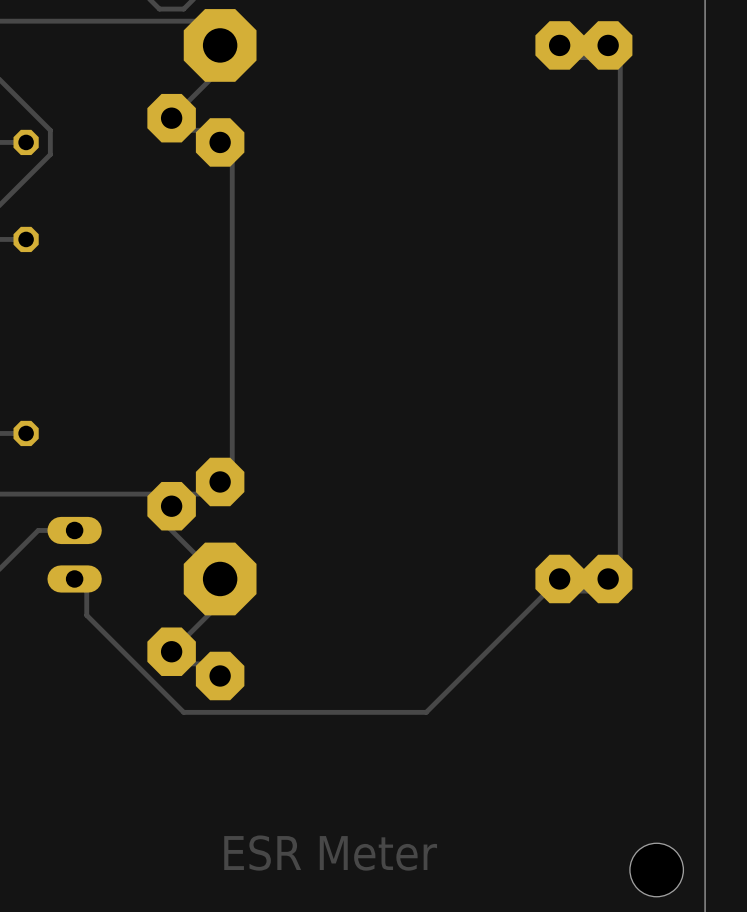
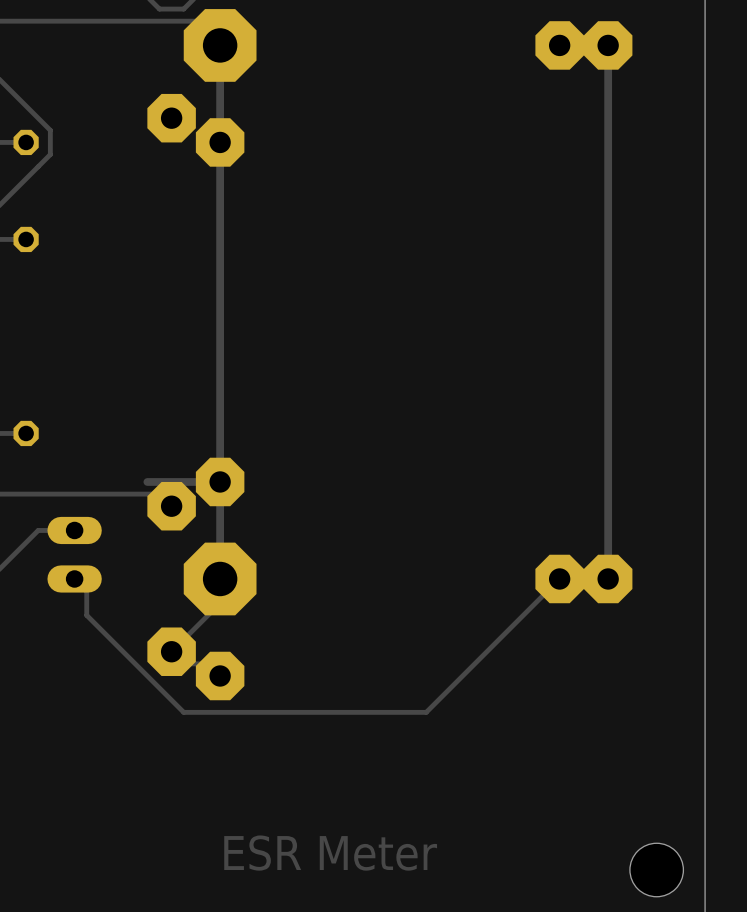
track: (559, 45) (571, 57) (596, 57) (608, 45) (620, 57) (620, 566) (596, 591) (571, 591) (559, 578) -> (559, 45) (608, 45) (608, 578) (559, 578)
track: (220, 69) (171, 118) (183, 130) (208, 130) (232, 154) (232, 469) (208, 494) (183, 494) (159, 518) (220, 578) -> (220, 69) (220, 578)
track: none -> (220, 481) (147, 481)

